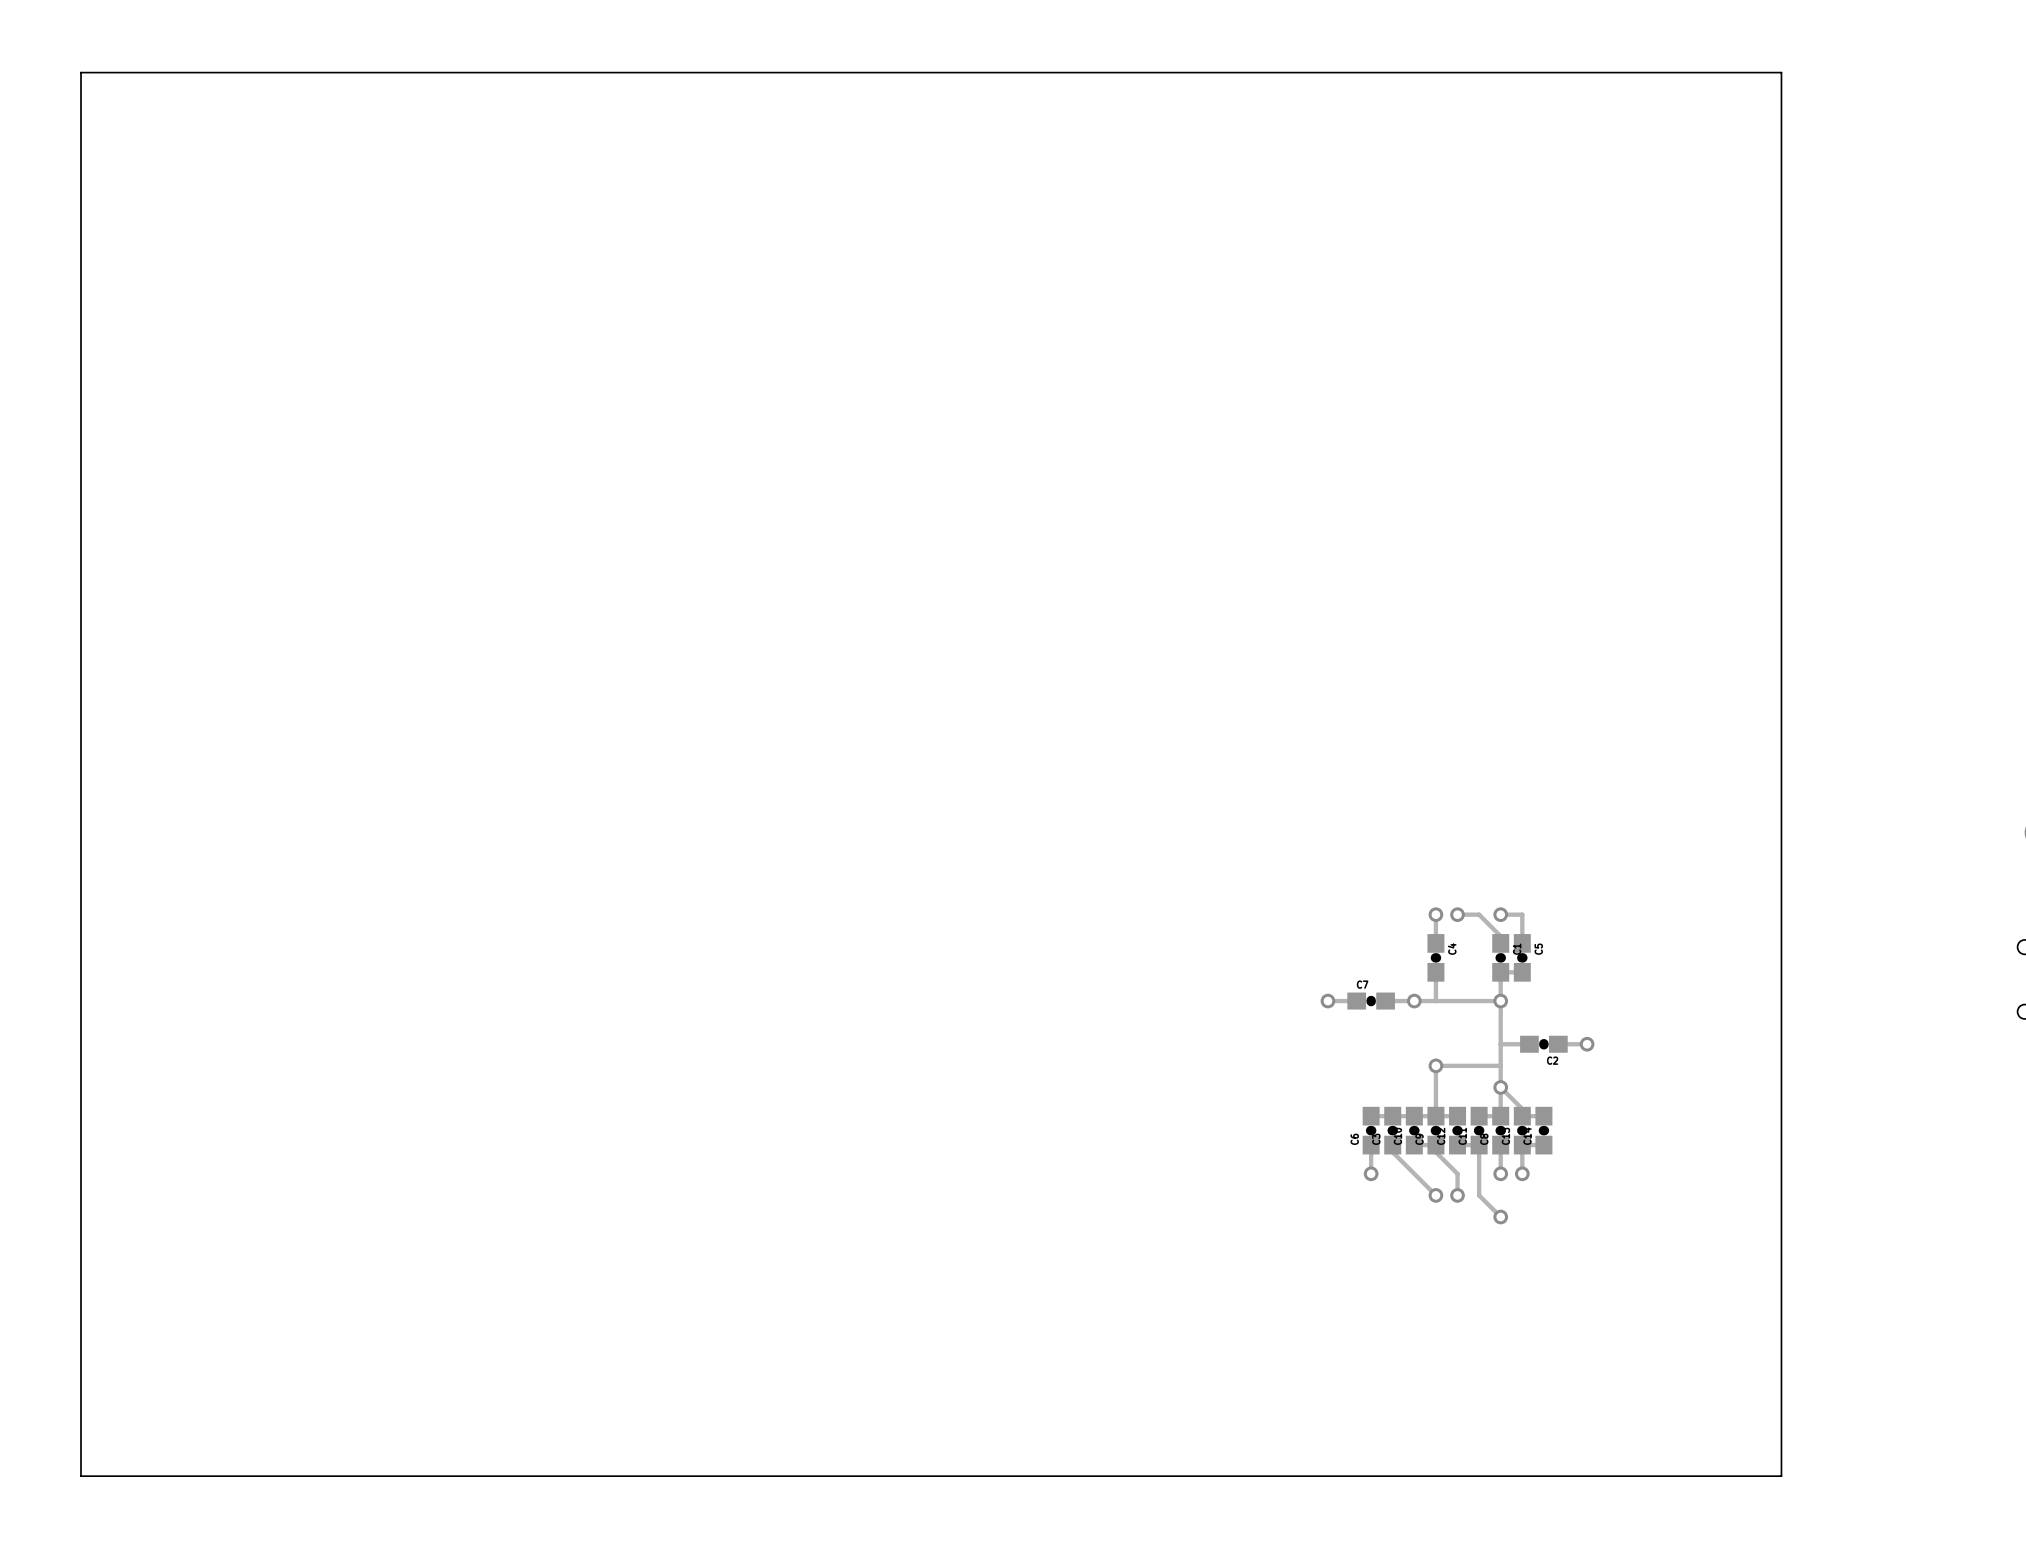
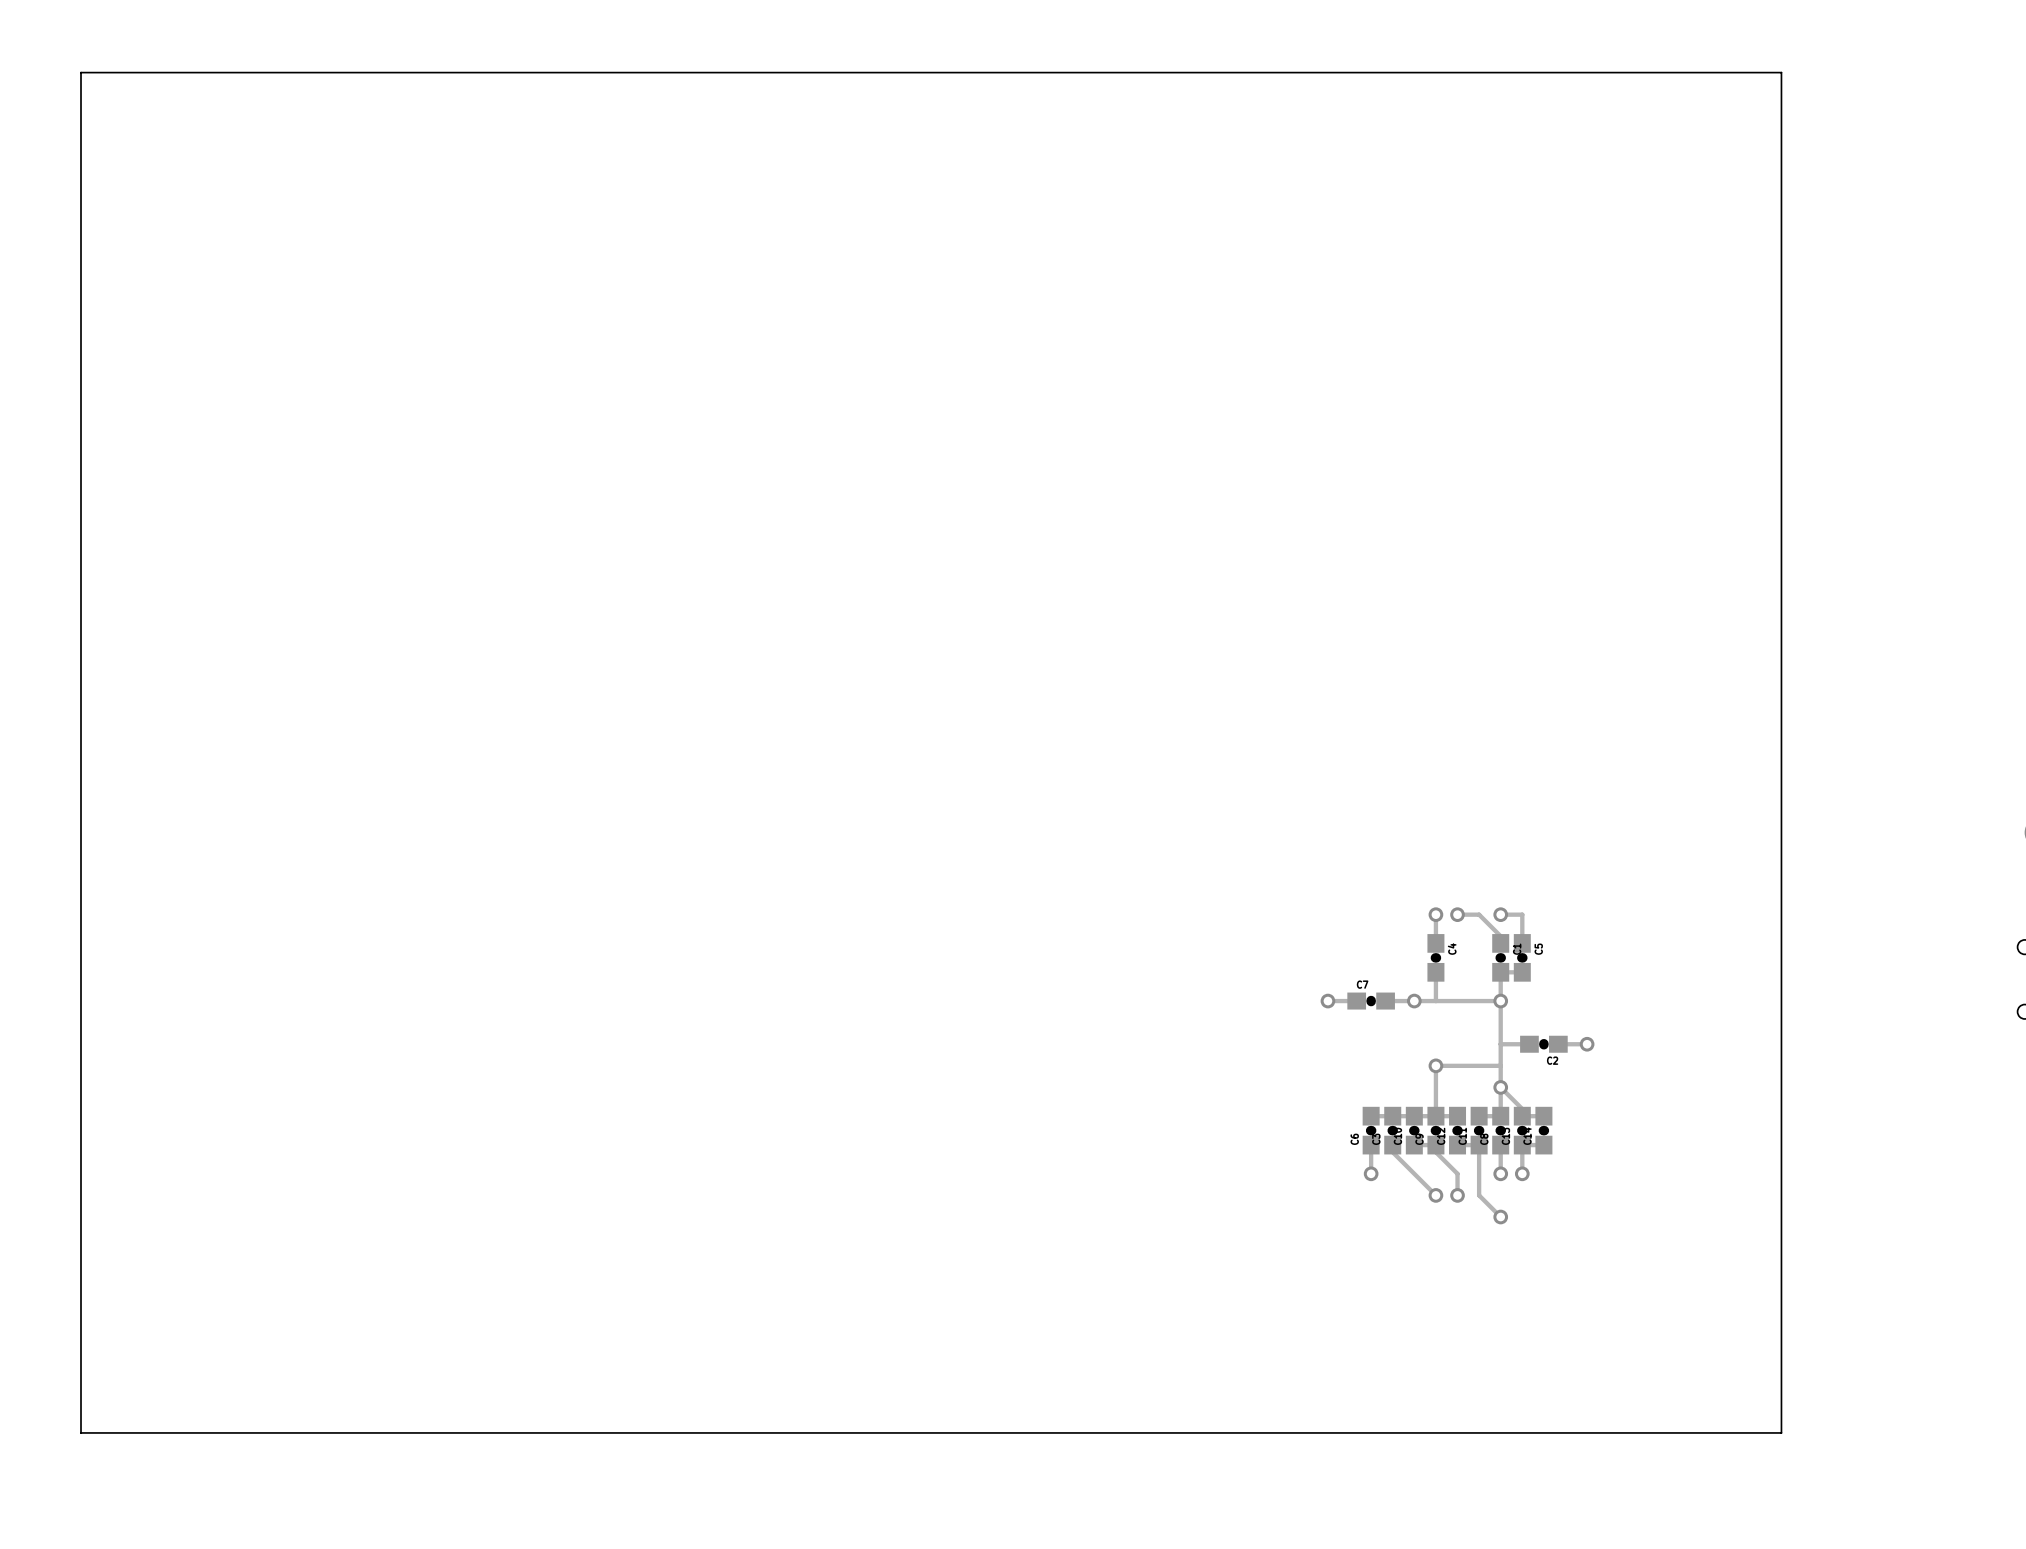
board edge: (1781, 1432) (1781, 1476) (81, 1476) (81, 1432) -> (1781, 1432) (81, 1432)

